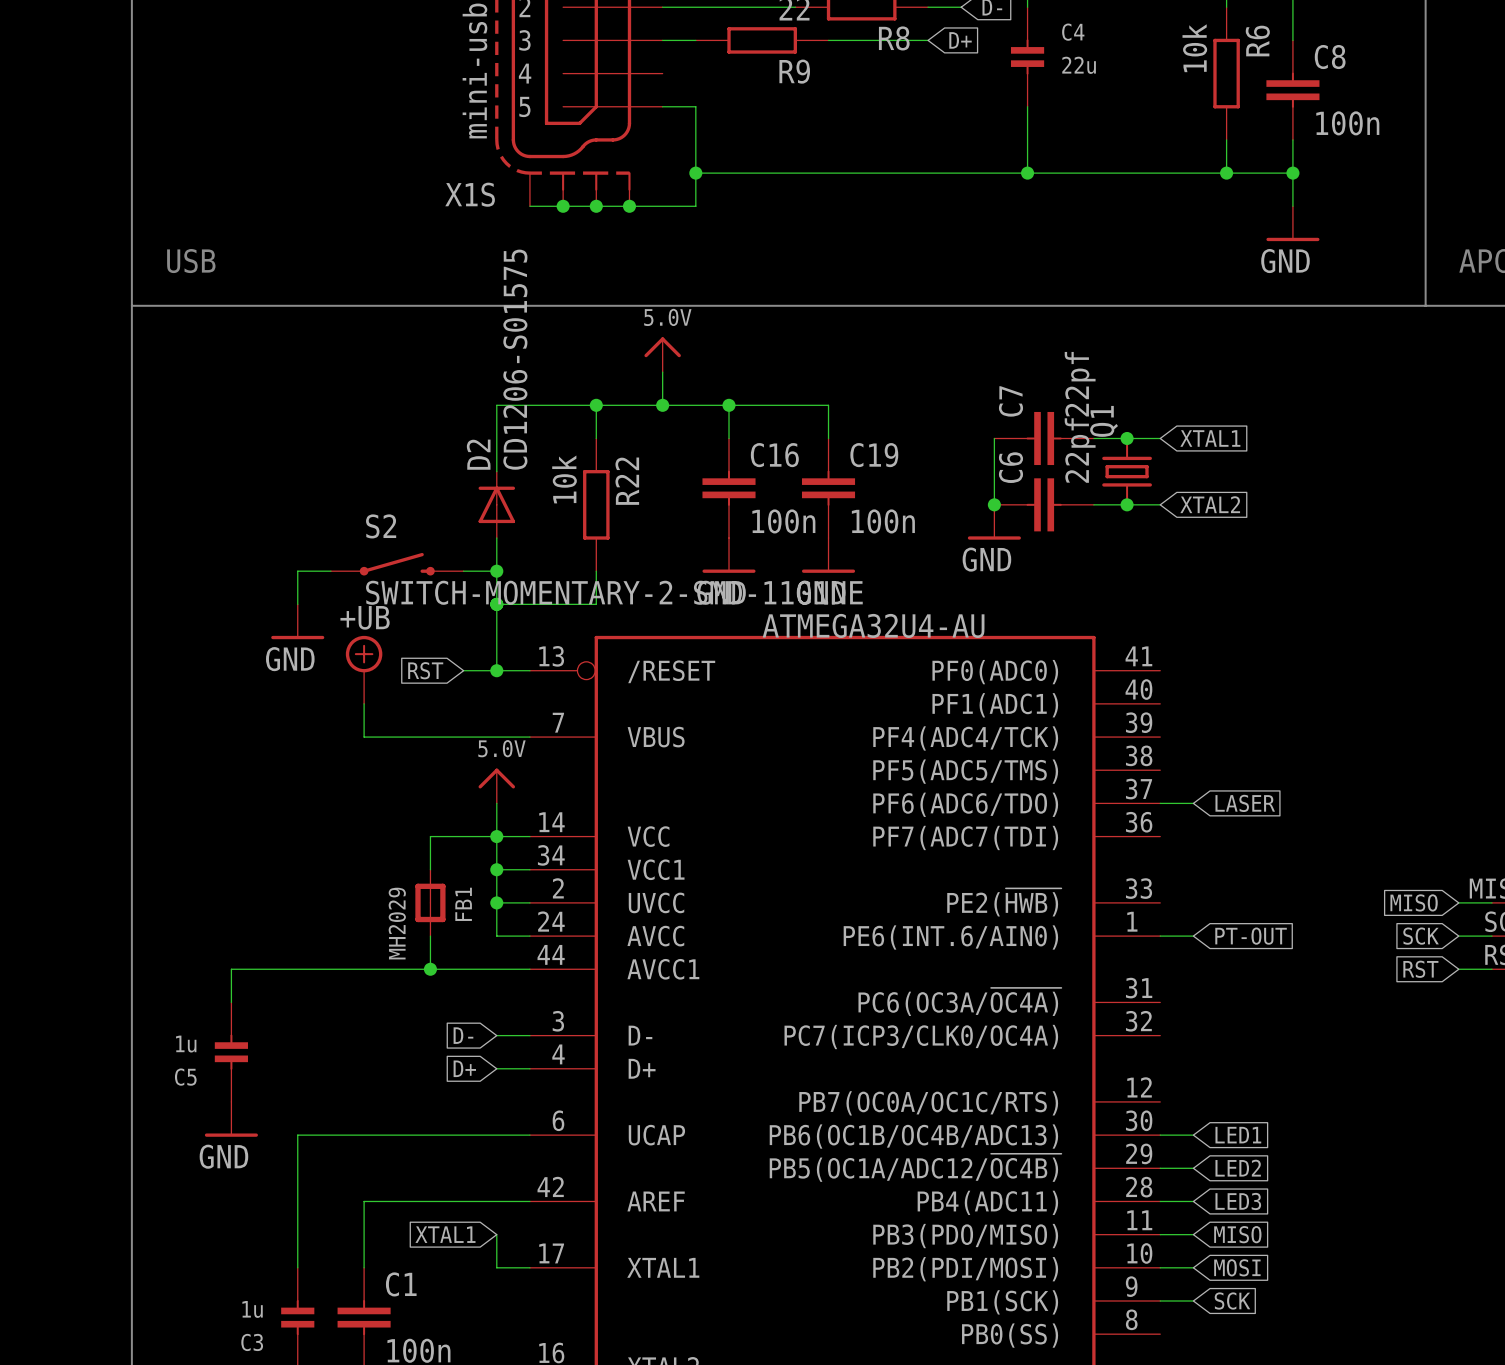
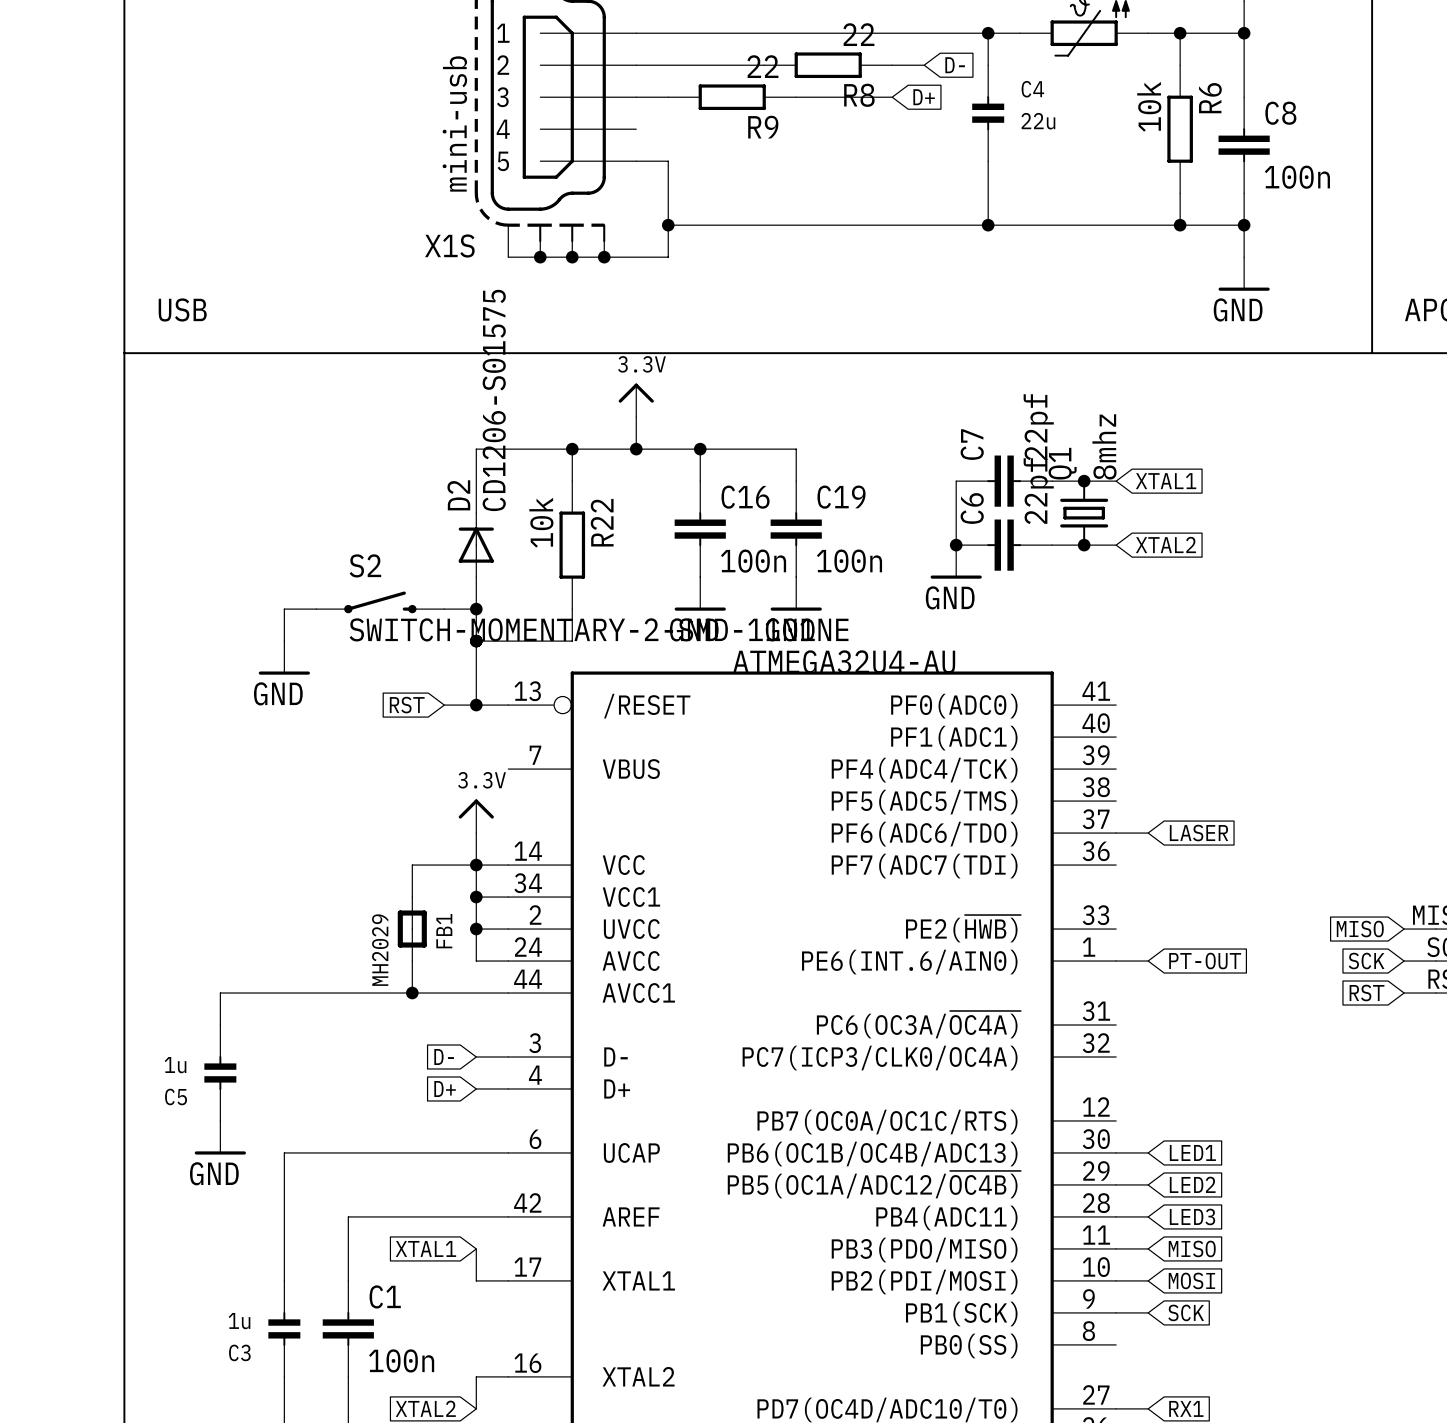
power symbol: 5.0V (662, 354) -> 3.3V (636, 400)
Q1 value: none -> 8mhz (1104, 446)
power symbol: +UB (364, 669) -> none
wire: (364, 703) (364, 737) (529, 737) -> none
power symbol: 5.0V (496, 785) -> 3.3V (476, 816)

